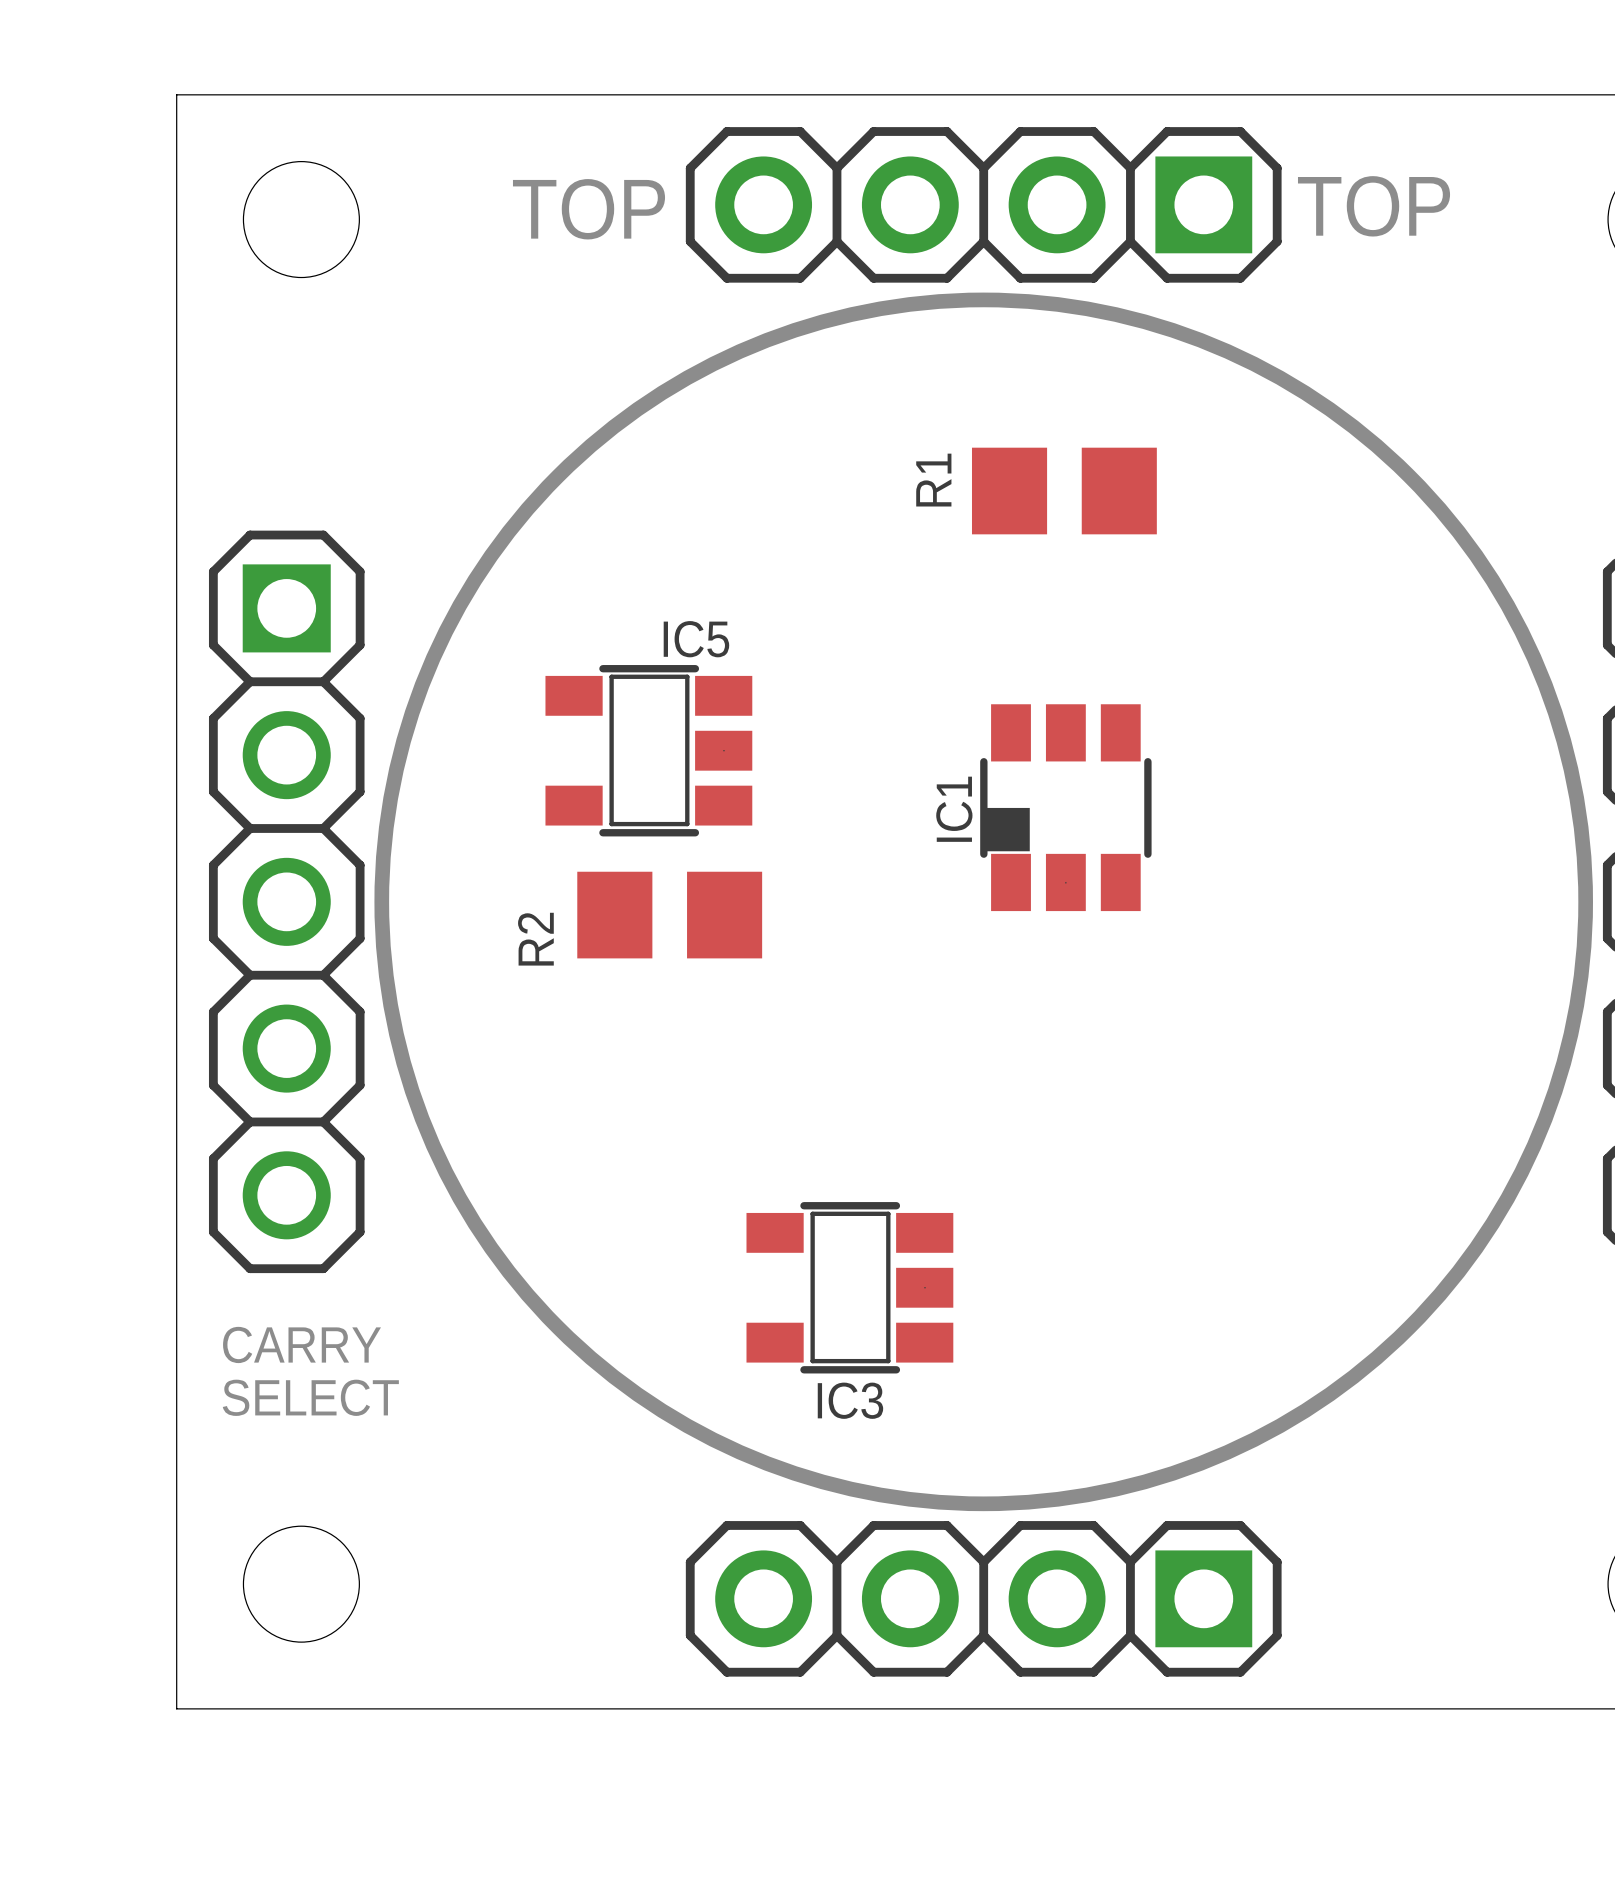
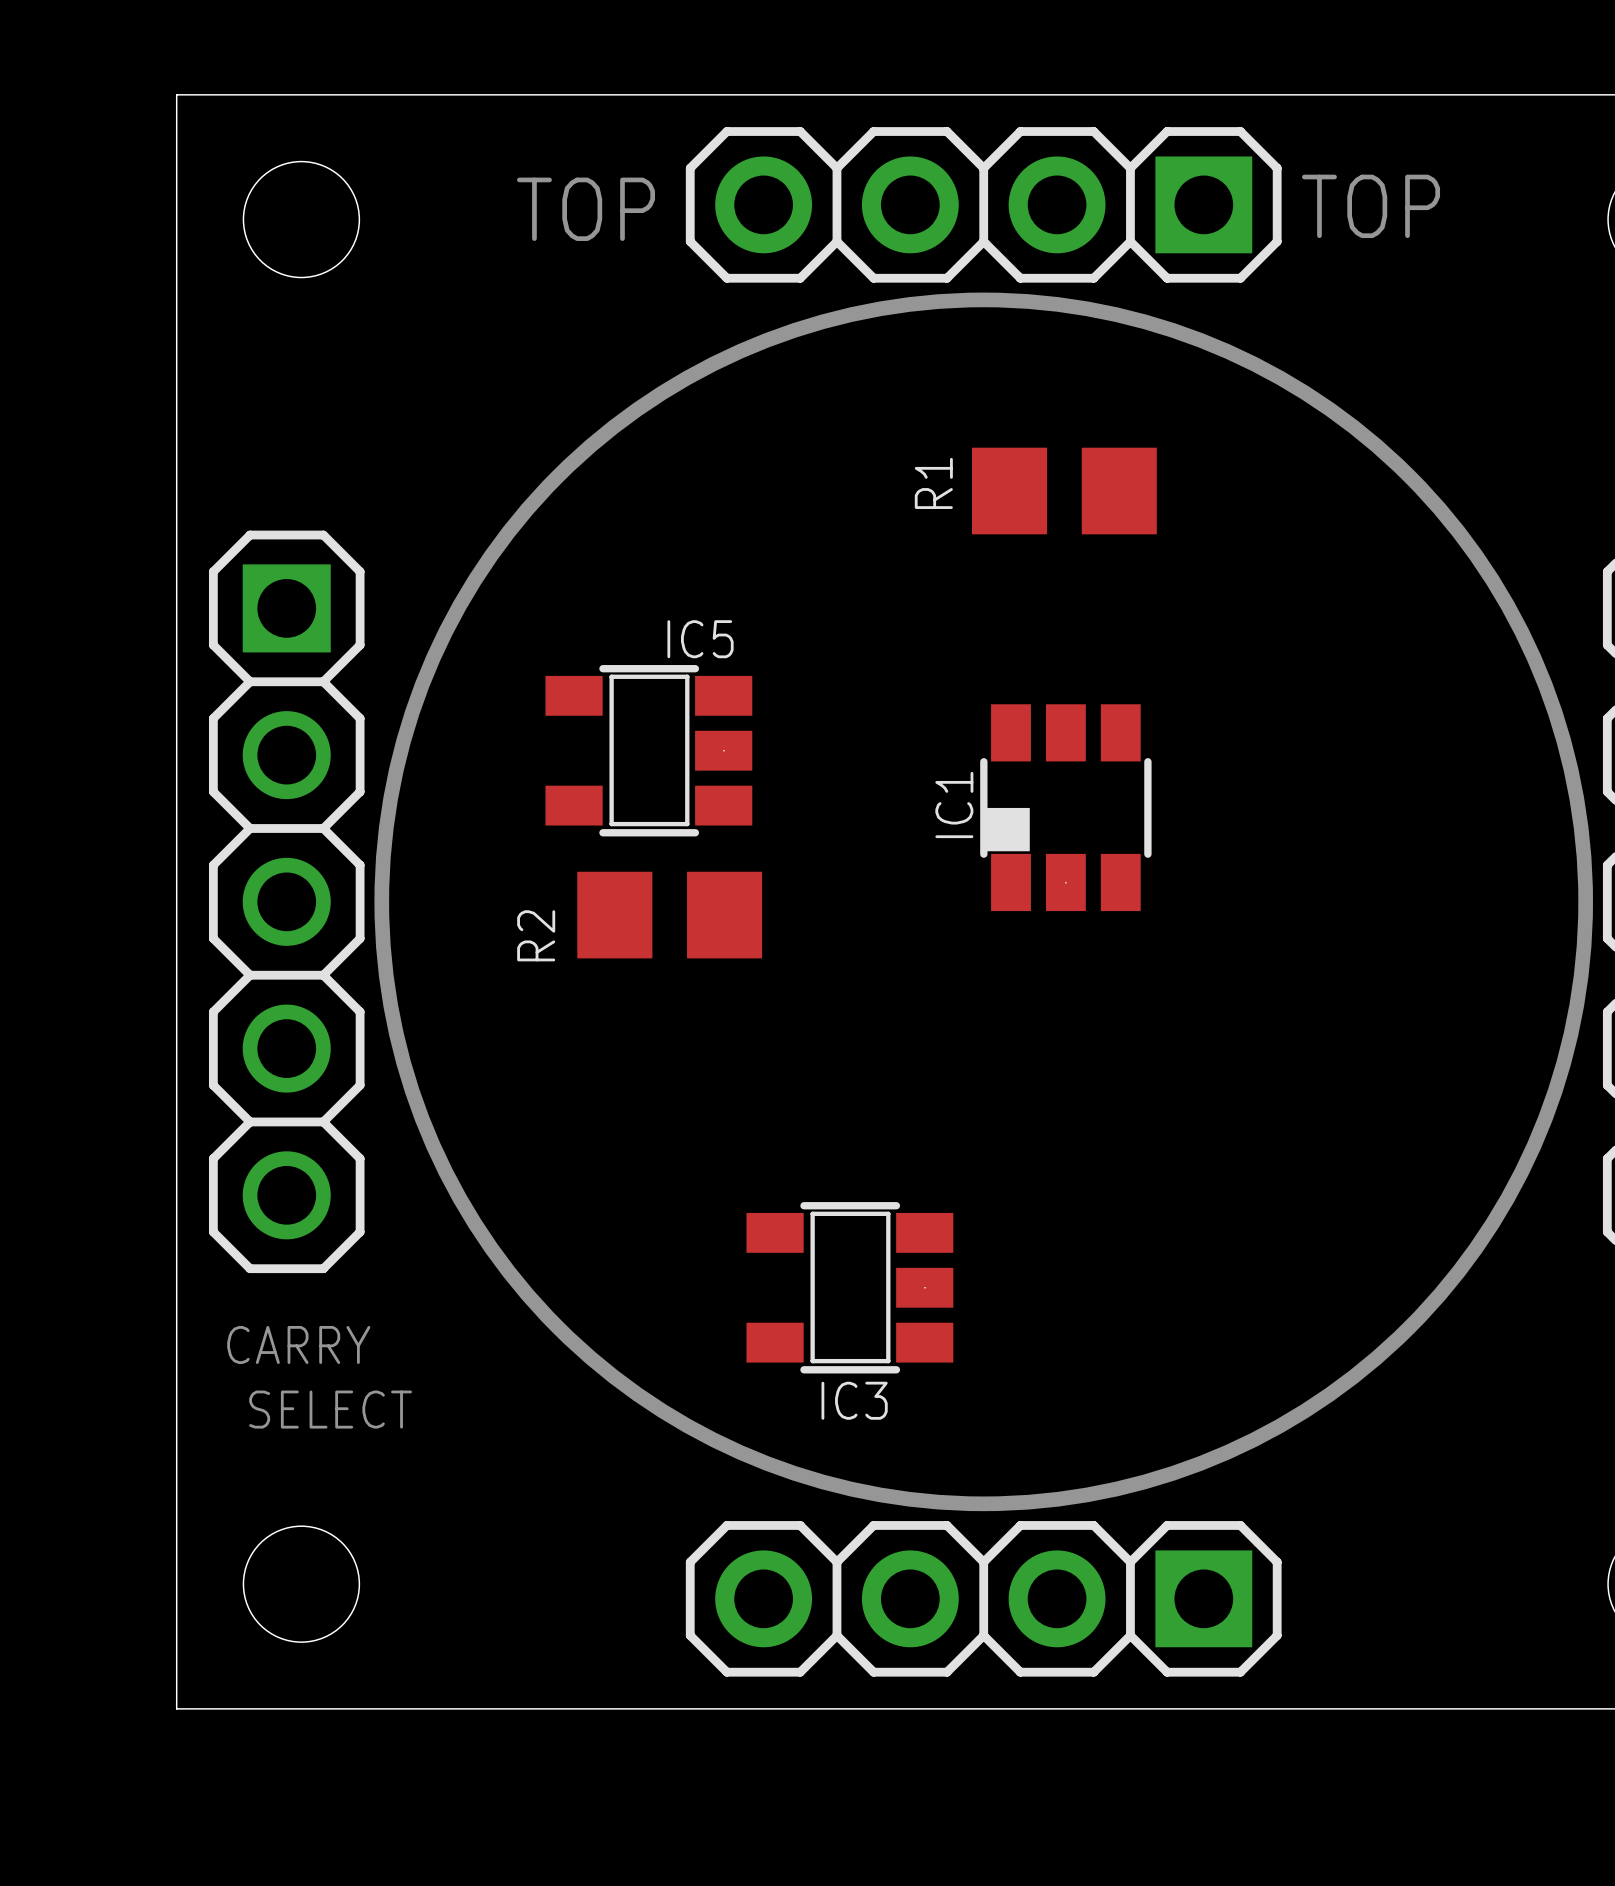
text position: SELECT (310, 1397) -> SELECT (330, 1409)

